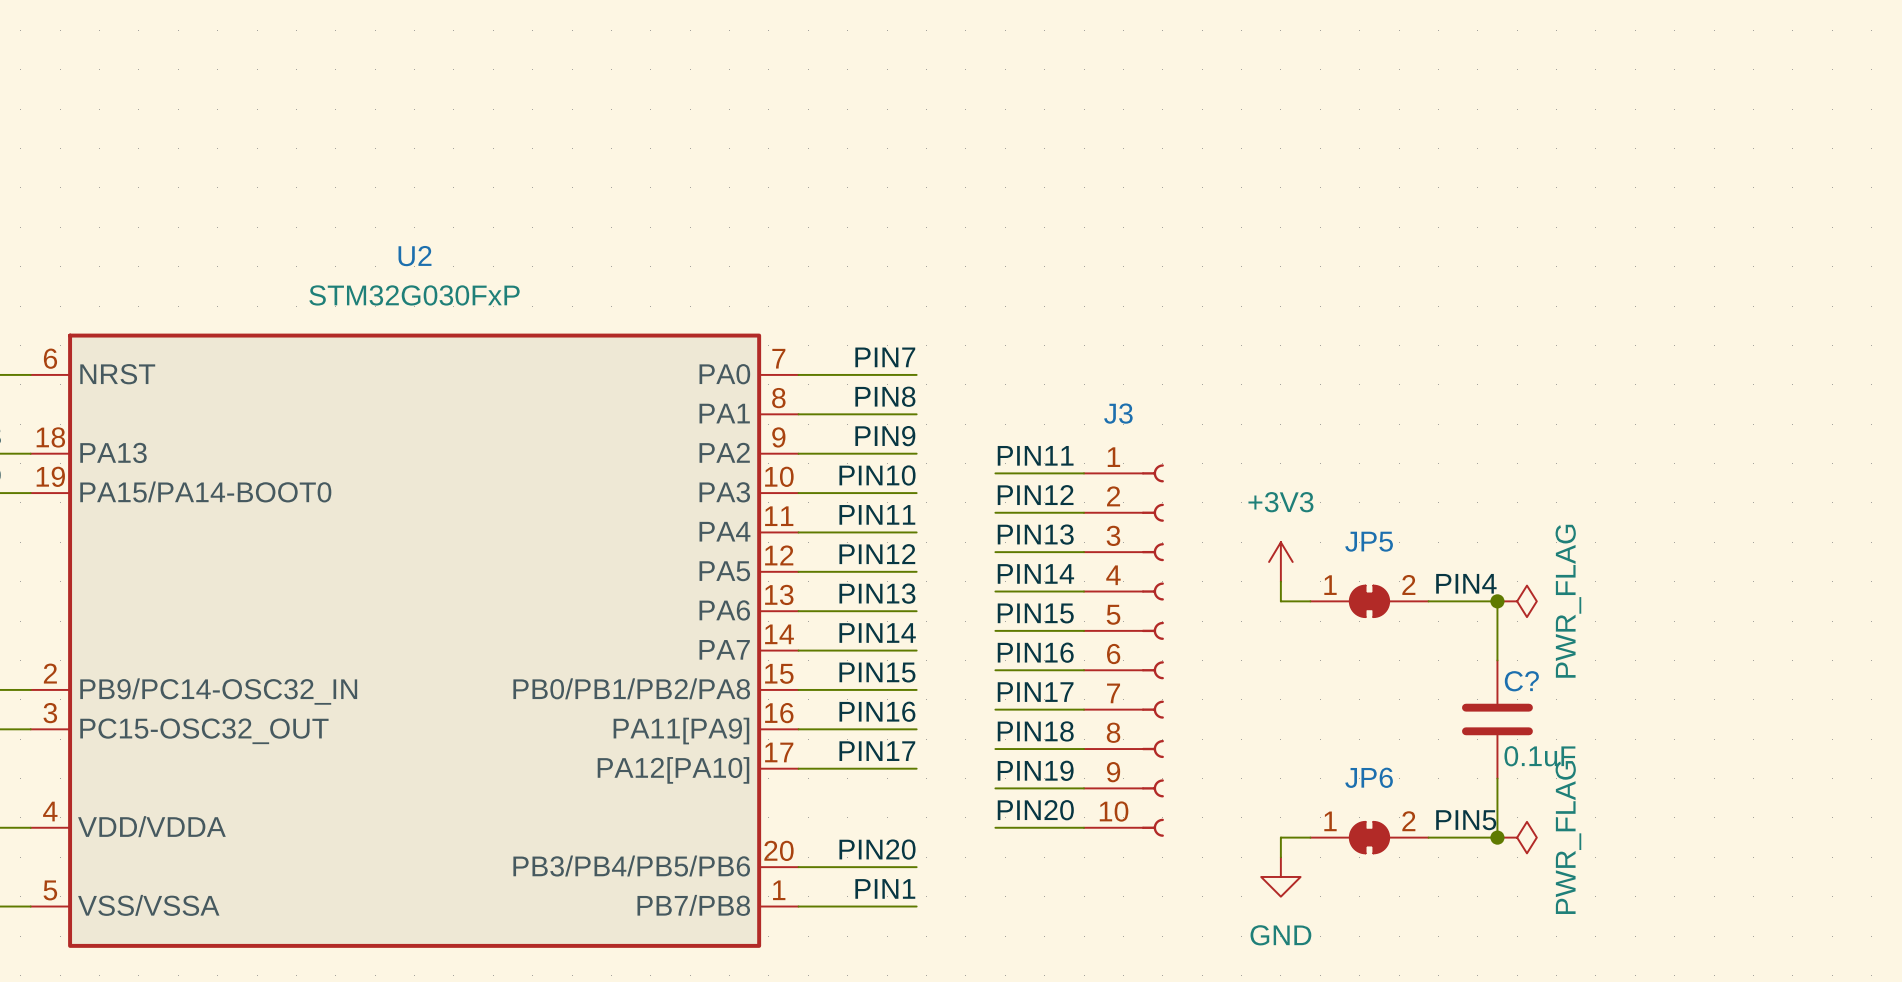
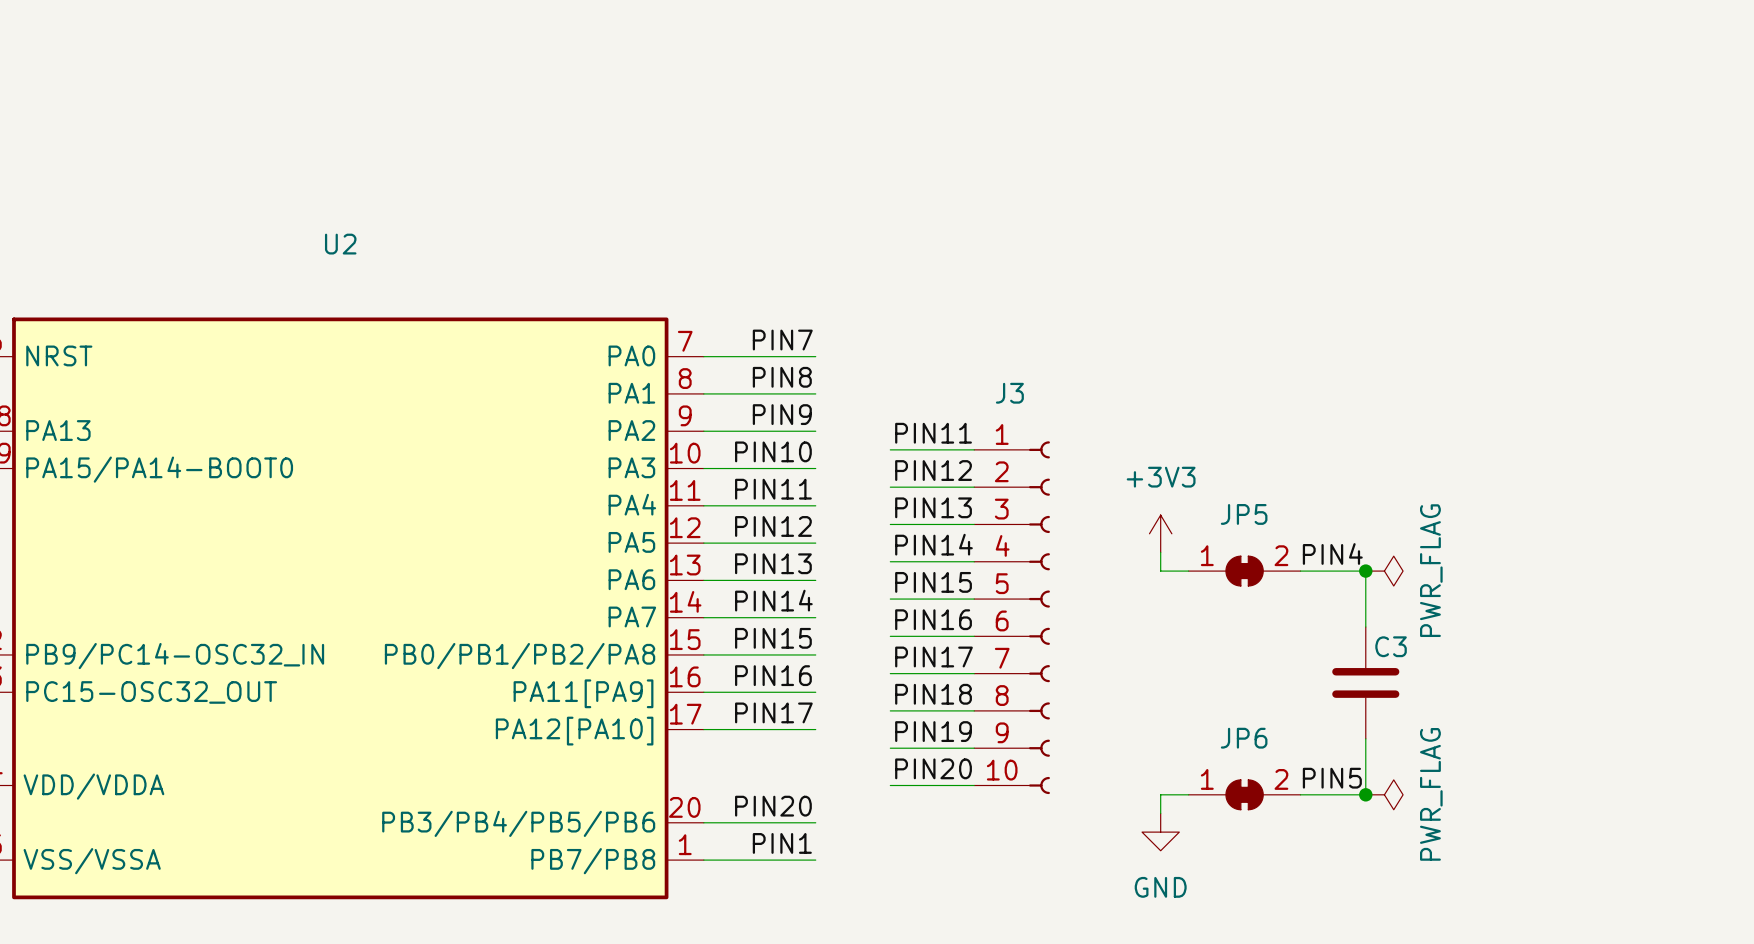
U2 value: STM32G030FxP (414, 295) -> none
C? name: C? (1521, 681) -> C3 (1391, 646)
C? value: 0.1uF (1539, 756) -> none

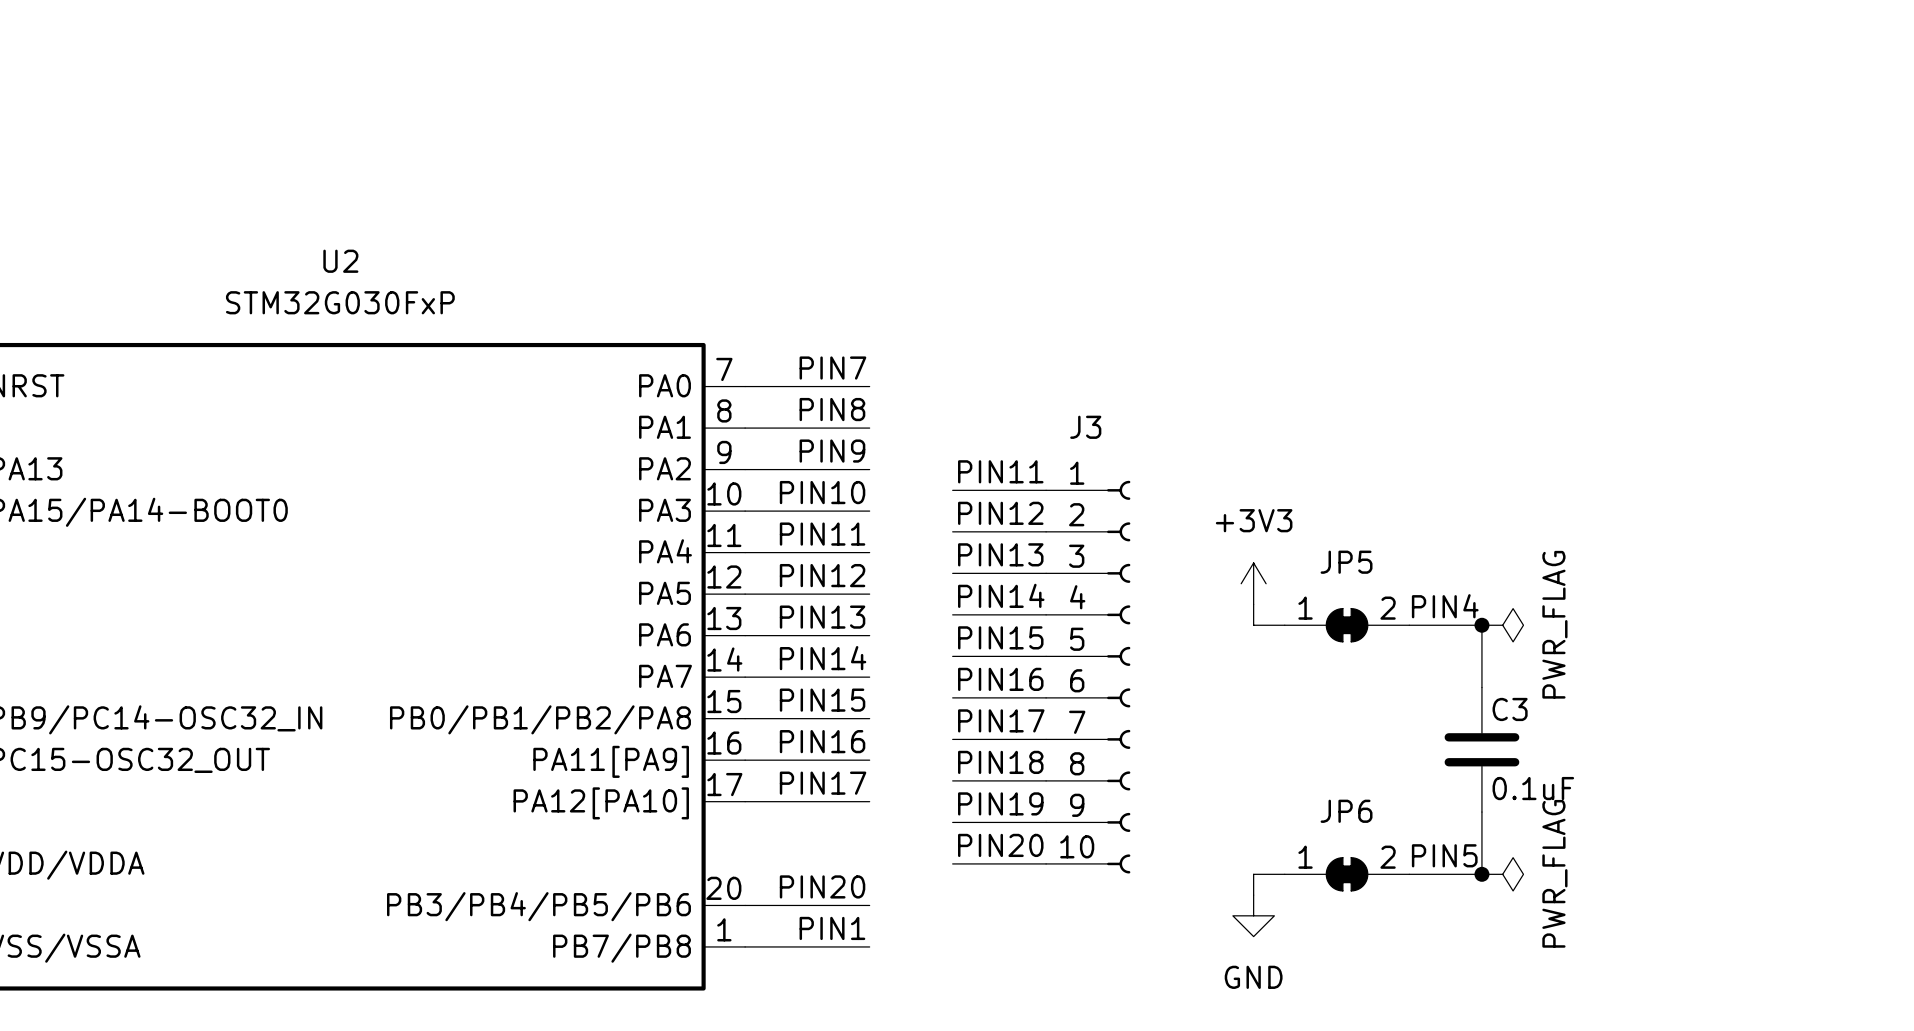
U2 value: none -> STM32G030FxP (340, 302)
C3 value: none -> 0.1uF (1533, 788)

